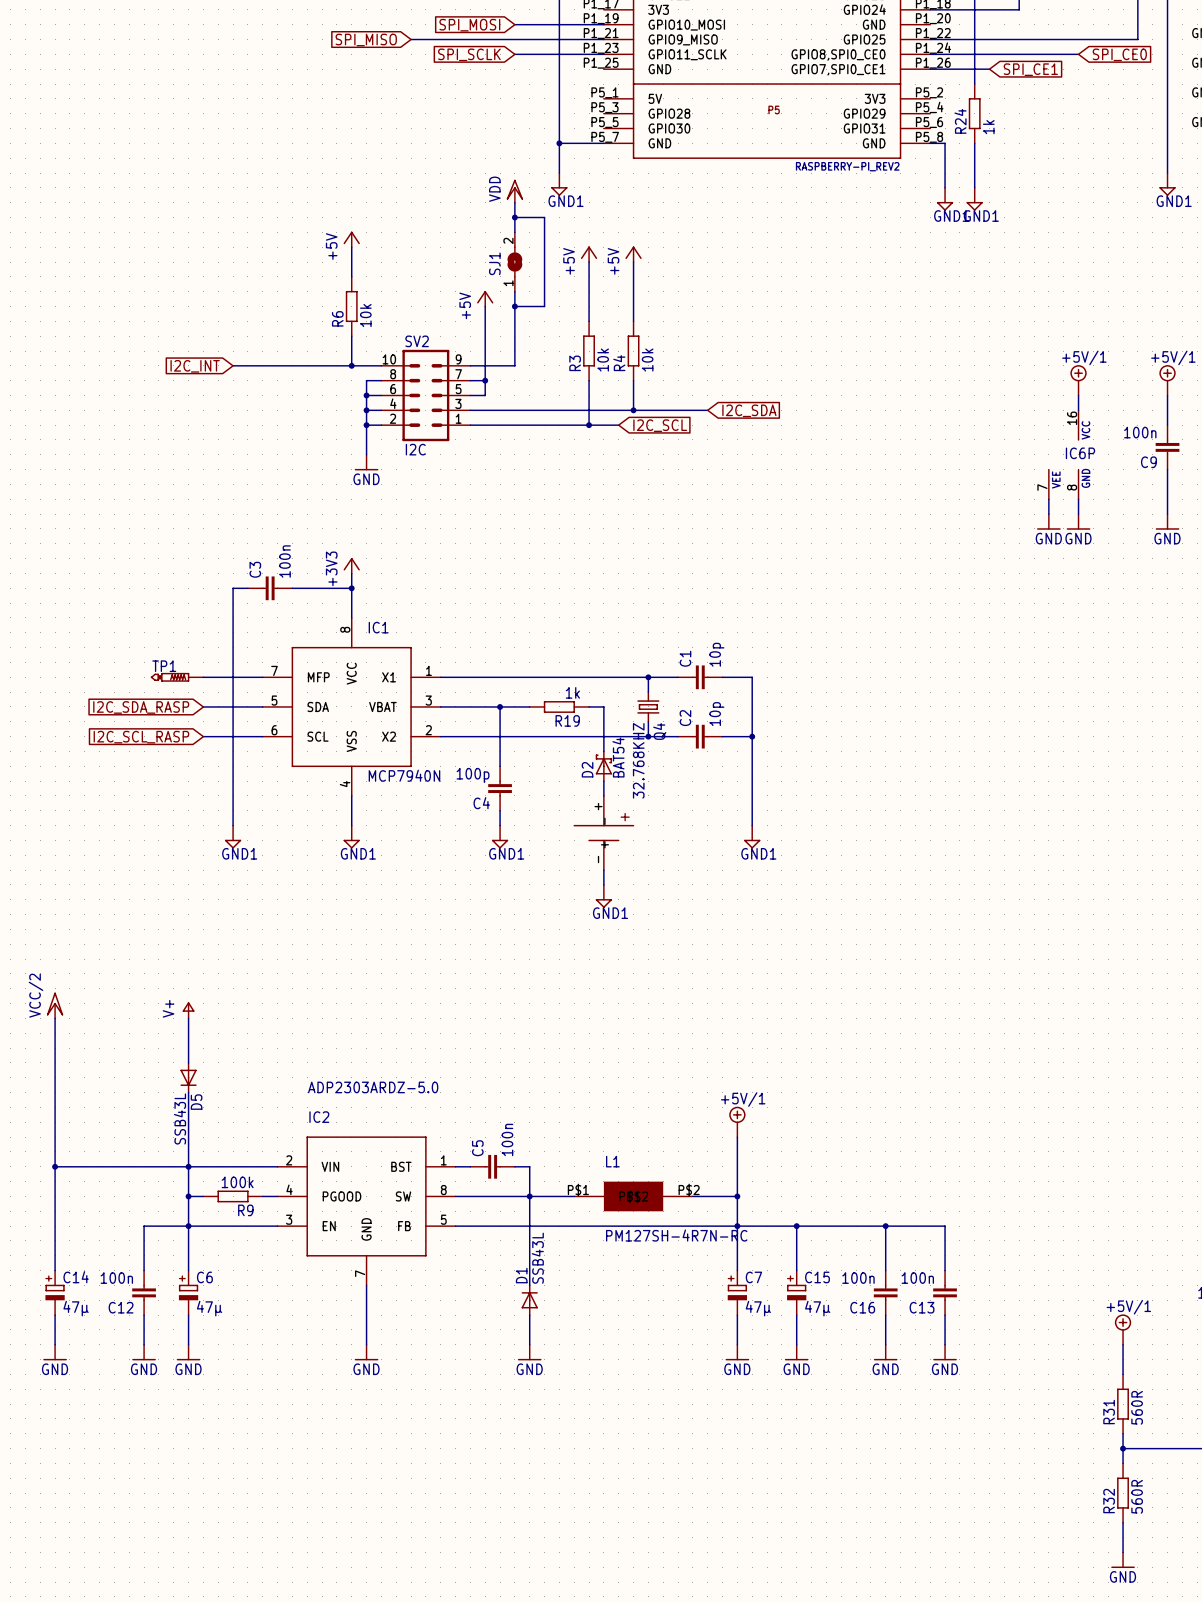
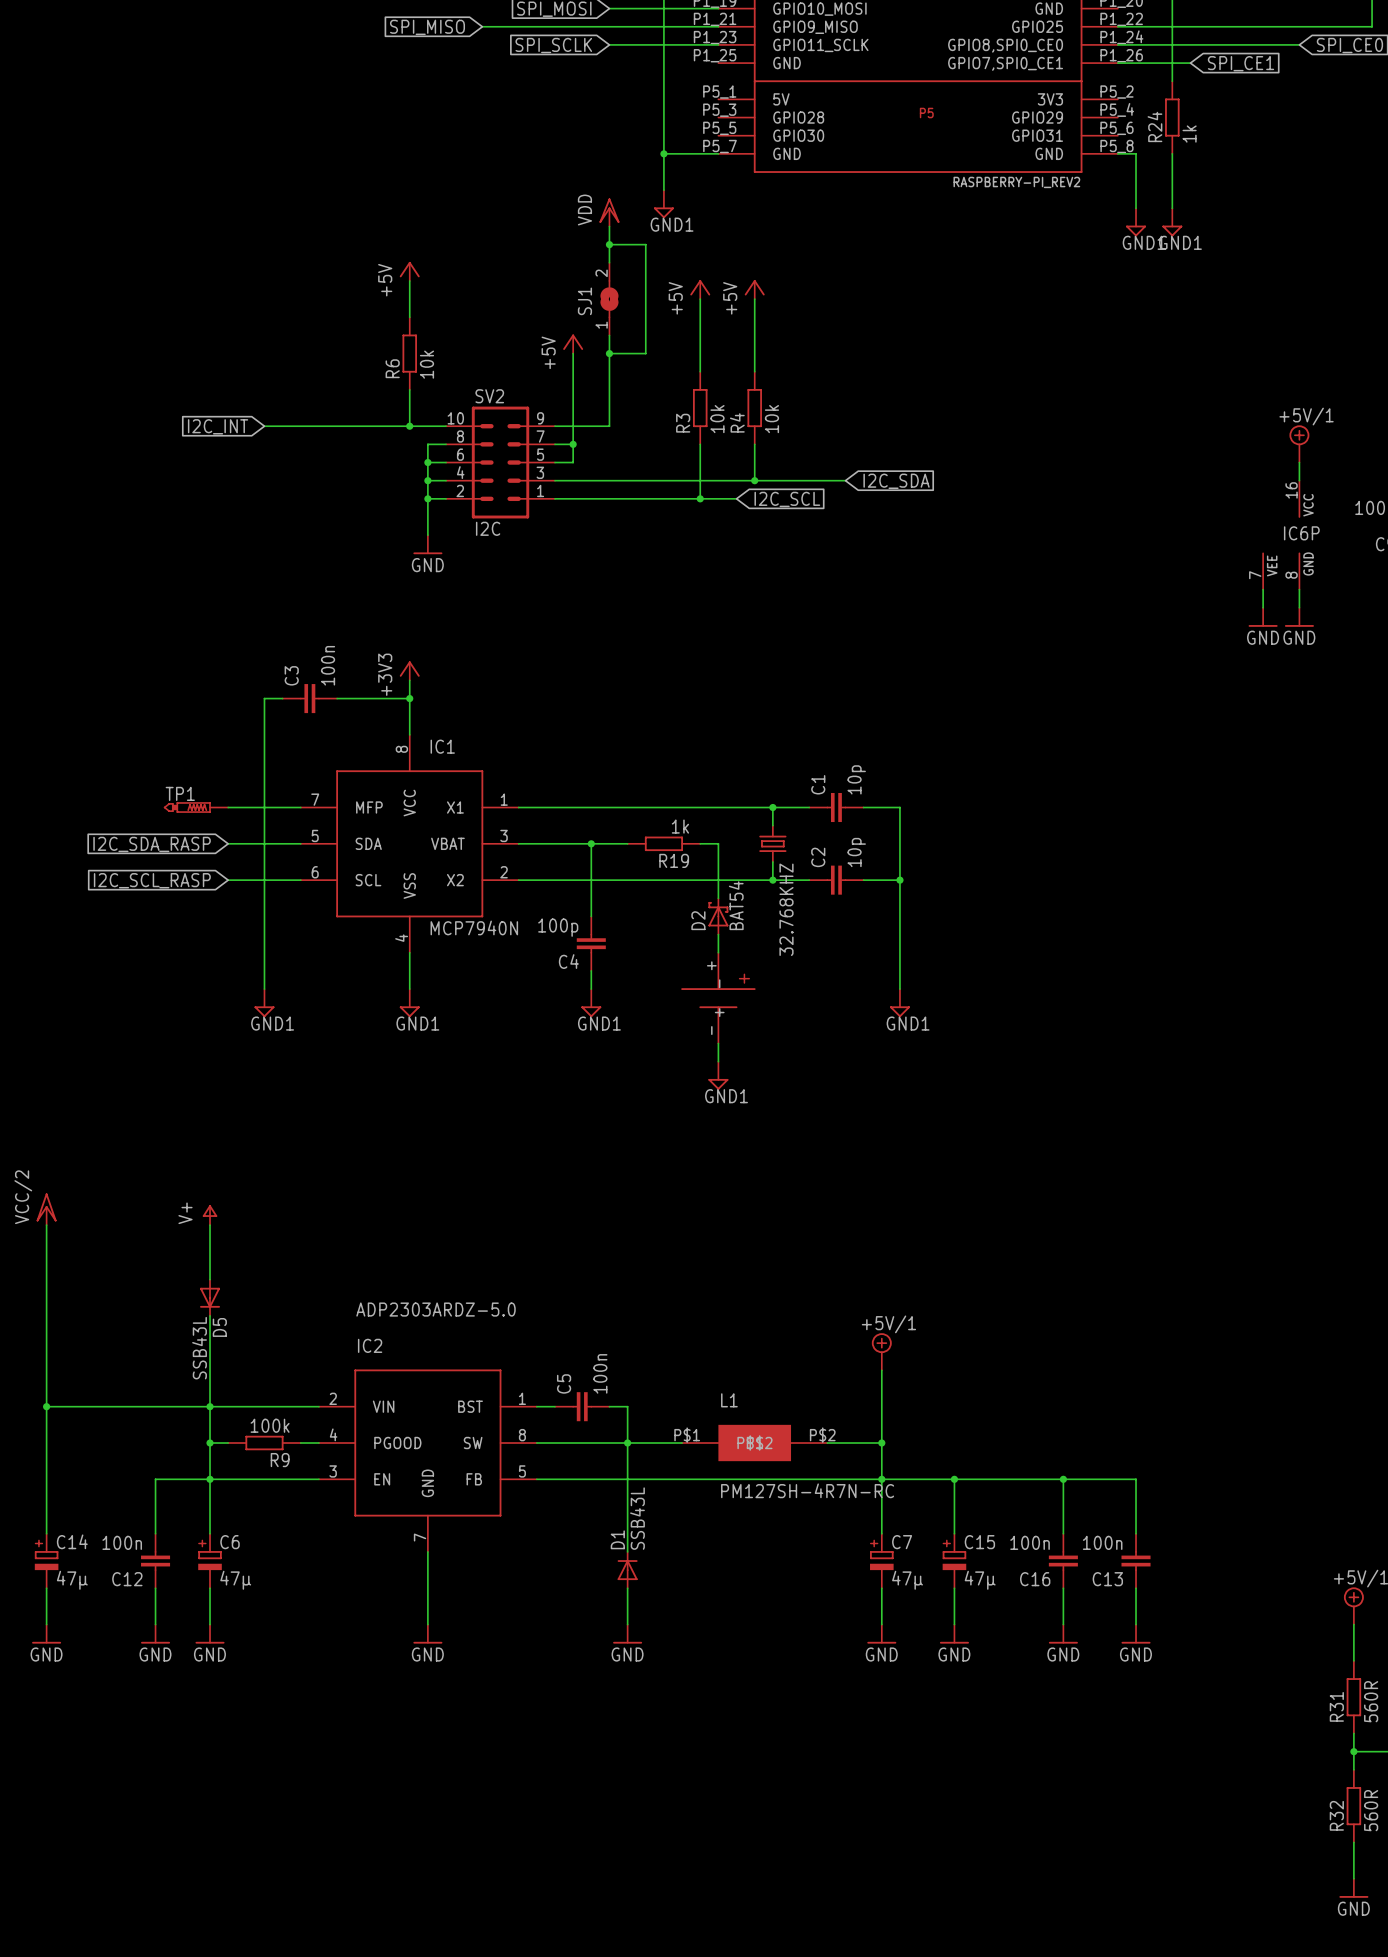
Q4 name: Q4 (659, 731) -> 32.768KHZ (786, 909)
Q4 value: 32.768KHZ (638, 760) -> none

